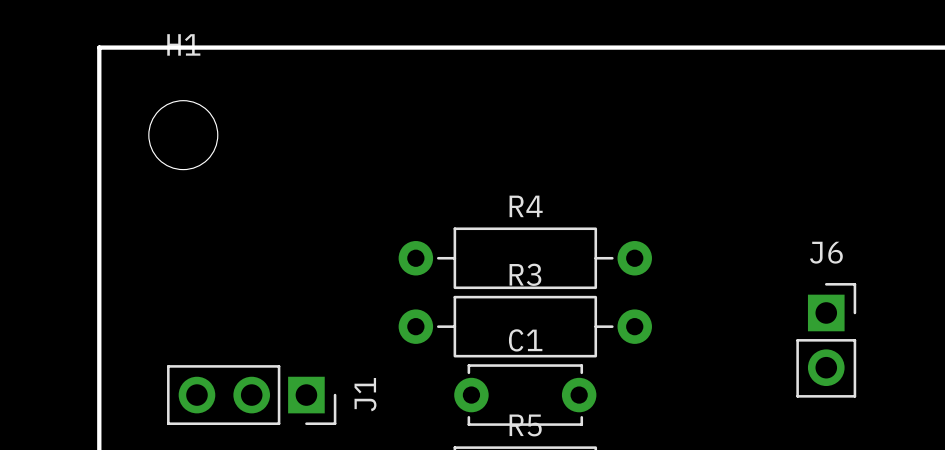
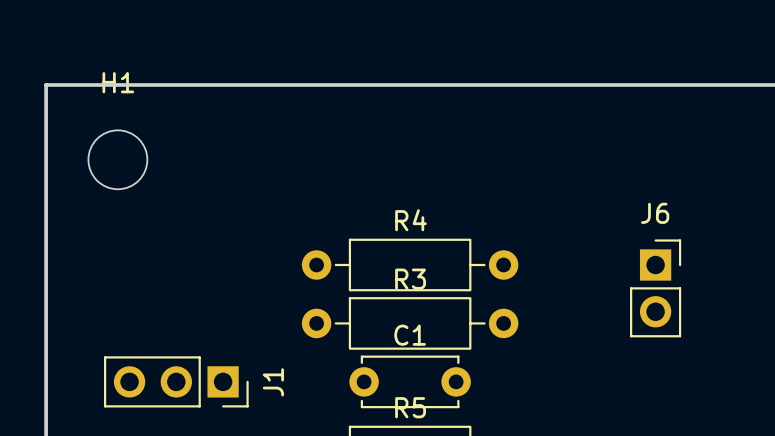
J6 position: (826, 340) -> (655, 288)

